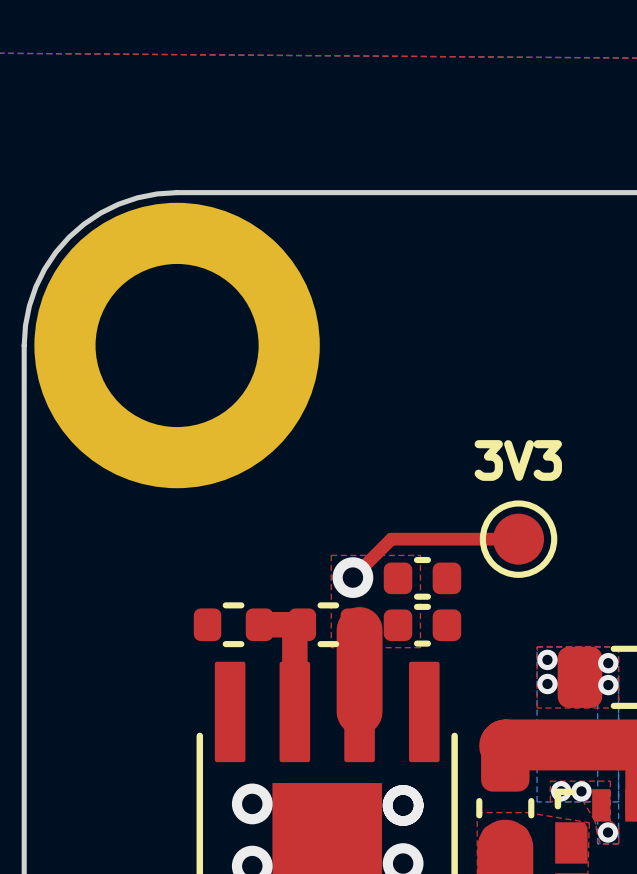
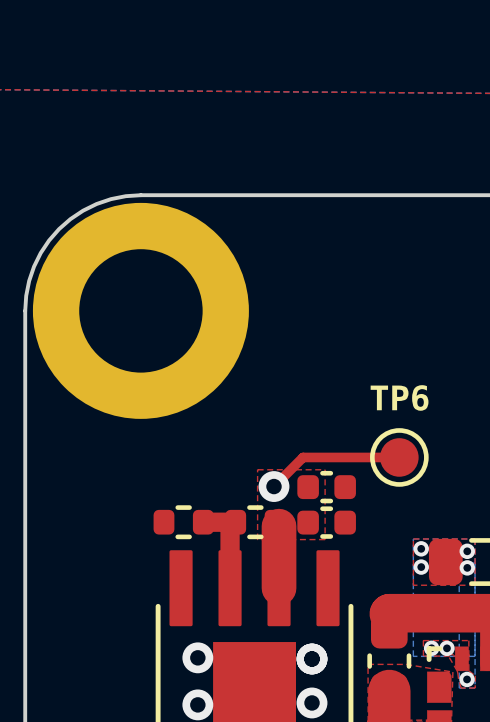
3V3 name: 3V3 (518, 460) -> TP6 (399, 397)

